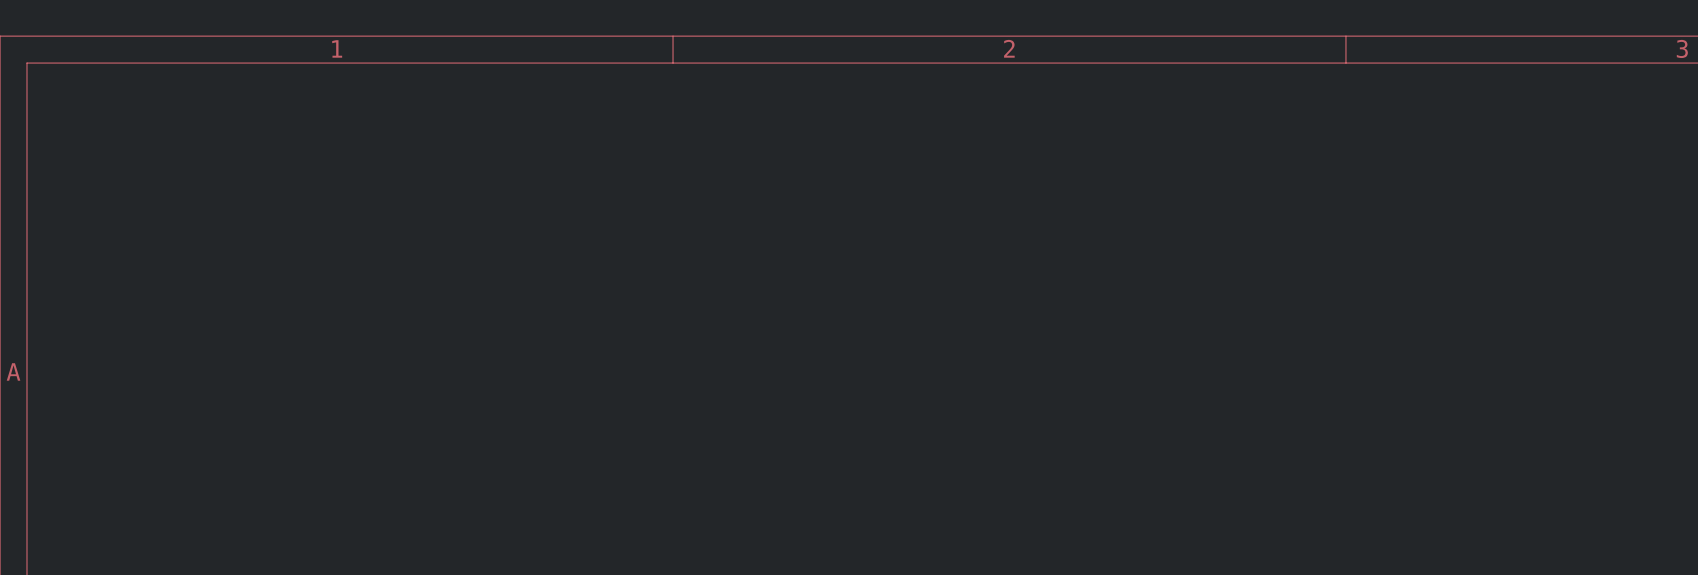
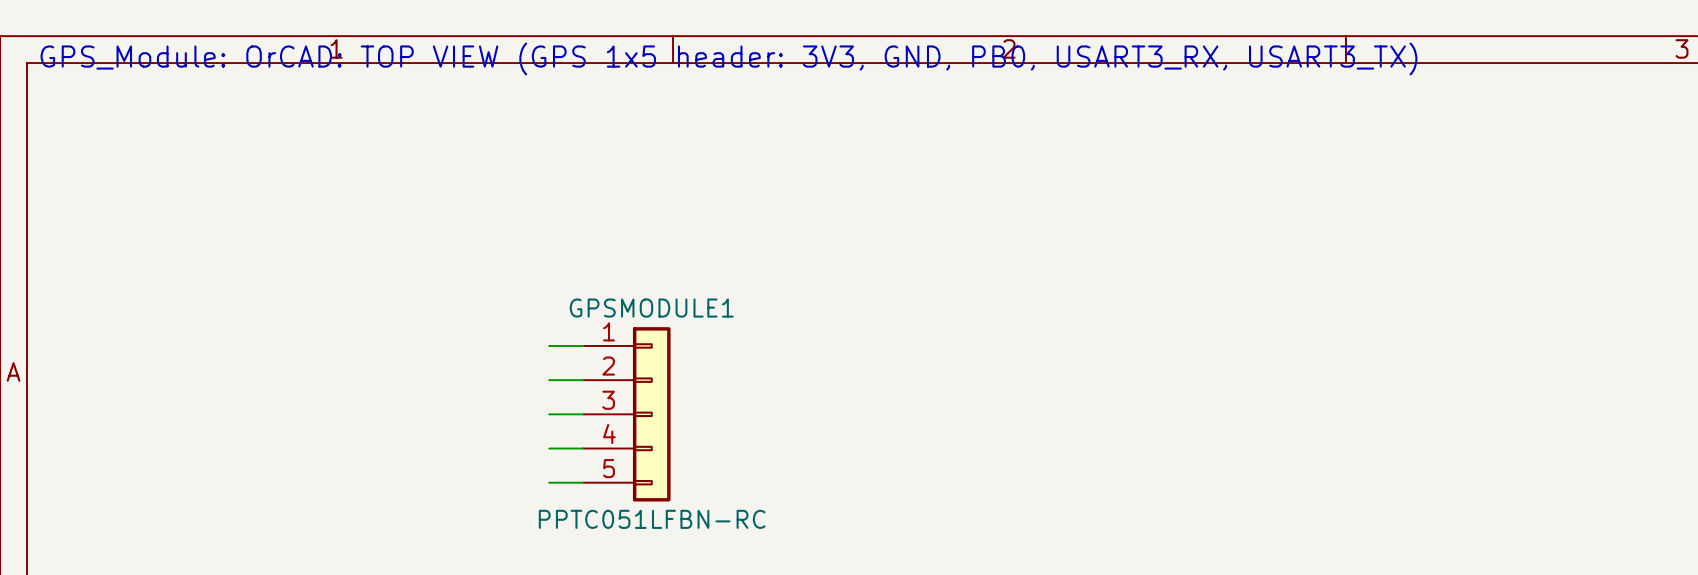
text: none -> GPS_Module: OrCAD: TOP VIEW (GPS 1x5 header: 3V3, GND, PB0, USART3_RX, USART3_TX) (728, 58)
wire: none -> (549, 345) (583, 345)
wire: none -> (549, 380) (583, 380)
wire: none -> (549, 414) (583, 414)
GPSMODULE1: none -> PPTC051LFBN-RC (626, 414)
wire: none -> (549, 448) (583, 448)
wire: none -> (549, 482) (583, 482)

